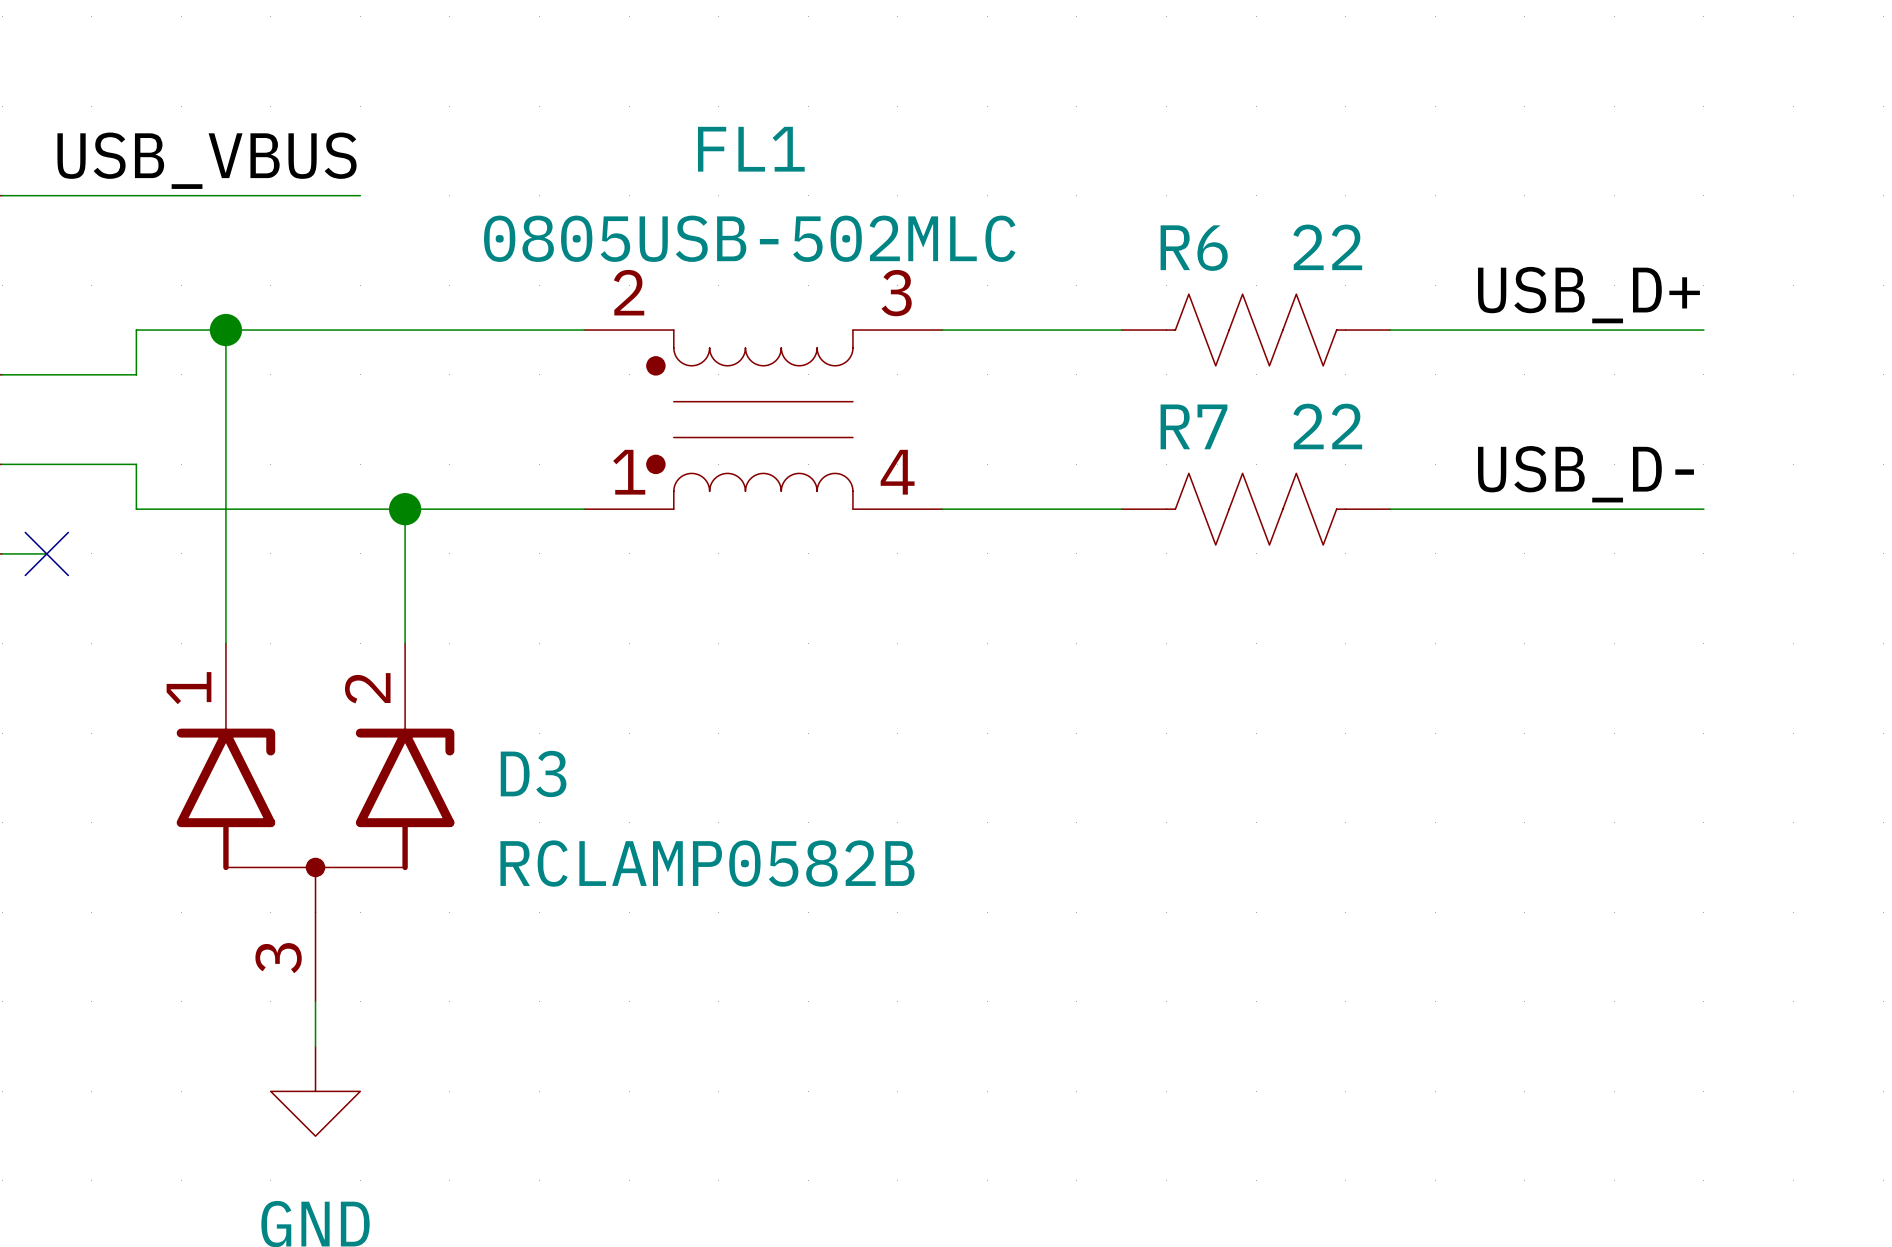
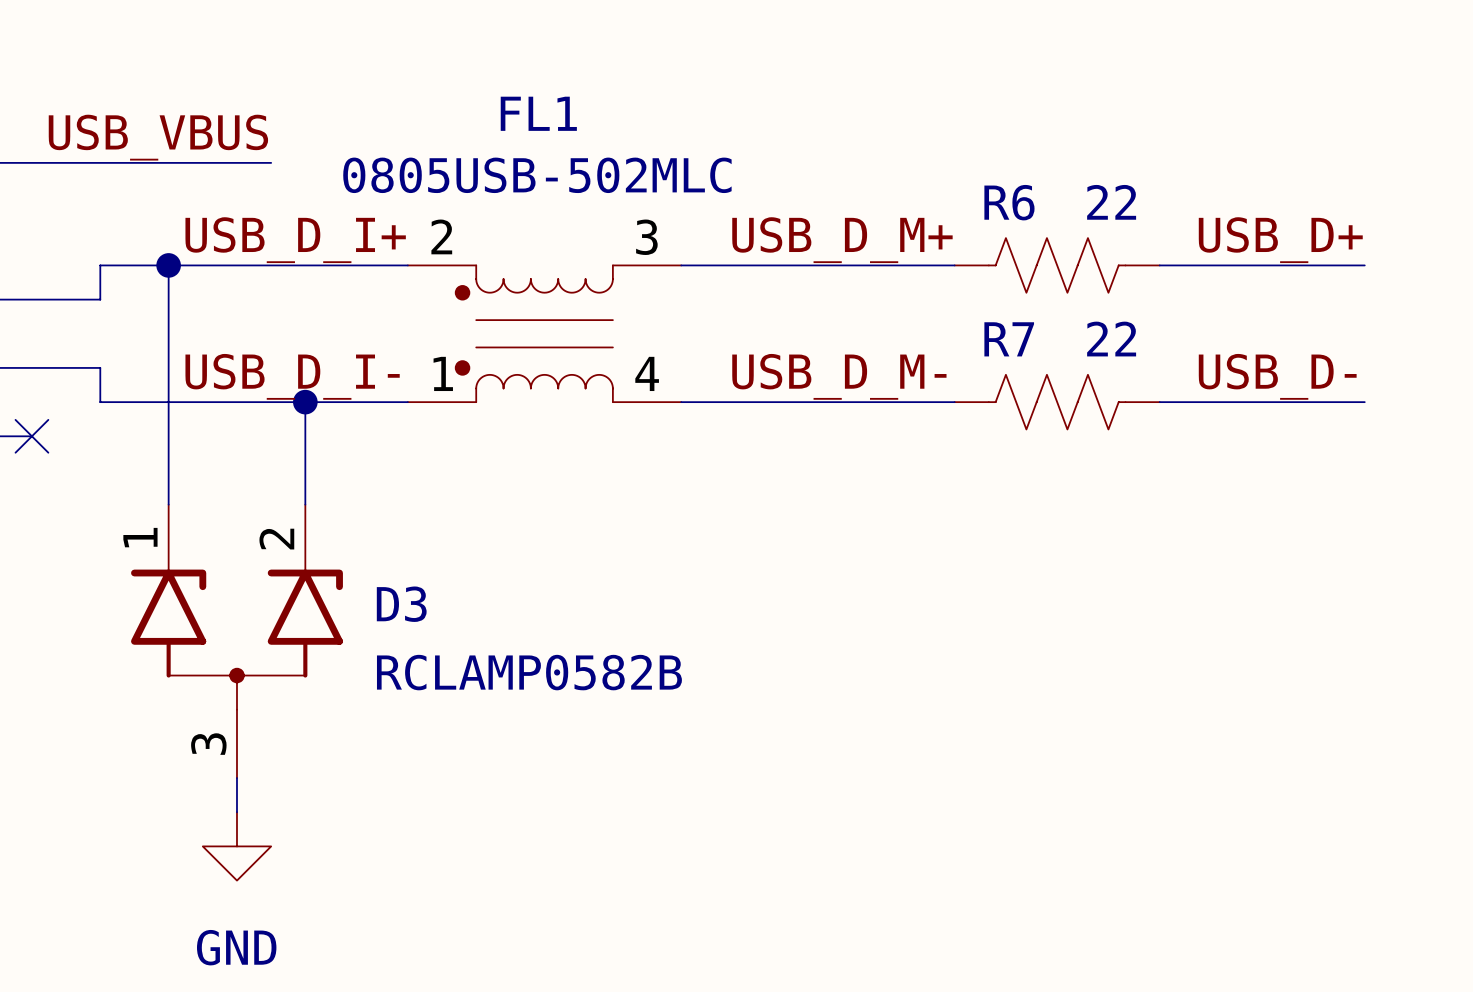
FL1 name position: FL1 (751, 149) -> FL1 (538, 113)
FL1 value position: 0805USB-502MLC (749, 238) -> 0805USB-502MLC (537, 175)
label: none -> USB_D_I+ (295, 240)
label: none -> USB_D_M+ (842, 240)
label position: USB_D+ (1588, 295) -> USB_D+ (1280, 240)
R6 position: (1256, 330) -> (1057, 265)
wire: (1390, 330) (1524, 330) -> (852, 265) (954, 265)
wire: none -> (1296, 265) (1364, 265)
FL1 position: (763, 419) -> (544, 333)
label: none -> USB_D_I- (292, 376)
label: none -> USB_D_M- (839, 376)
label position: USB_D- (1585, 474) -> USB_D- (1277, 376)
R7 position: (1256, 509) -> (1057, 402)
wire: (1390, 509) (1524, 509) -> (852, 402) (954, 402)
wire: none -> (1296, 402) (1364, 402)

